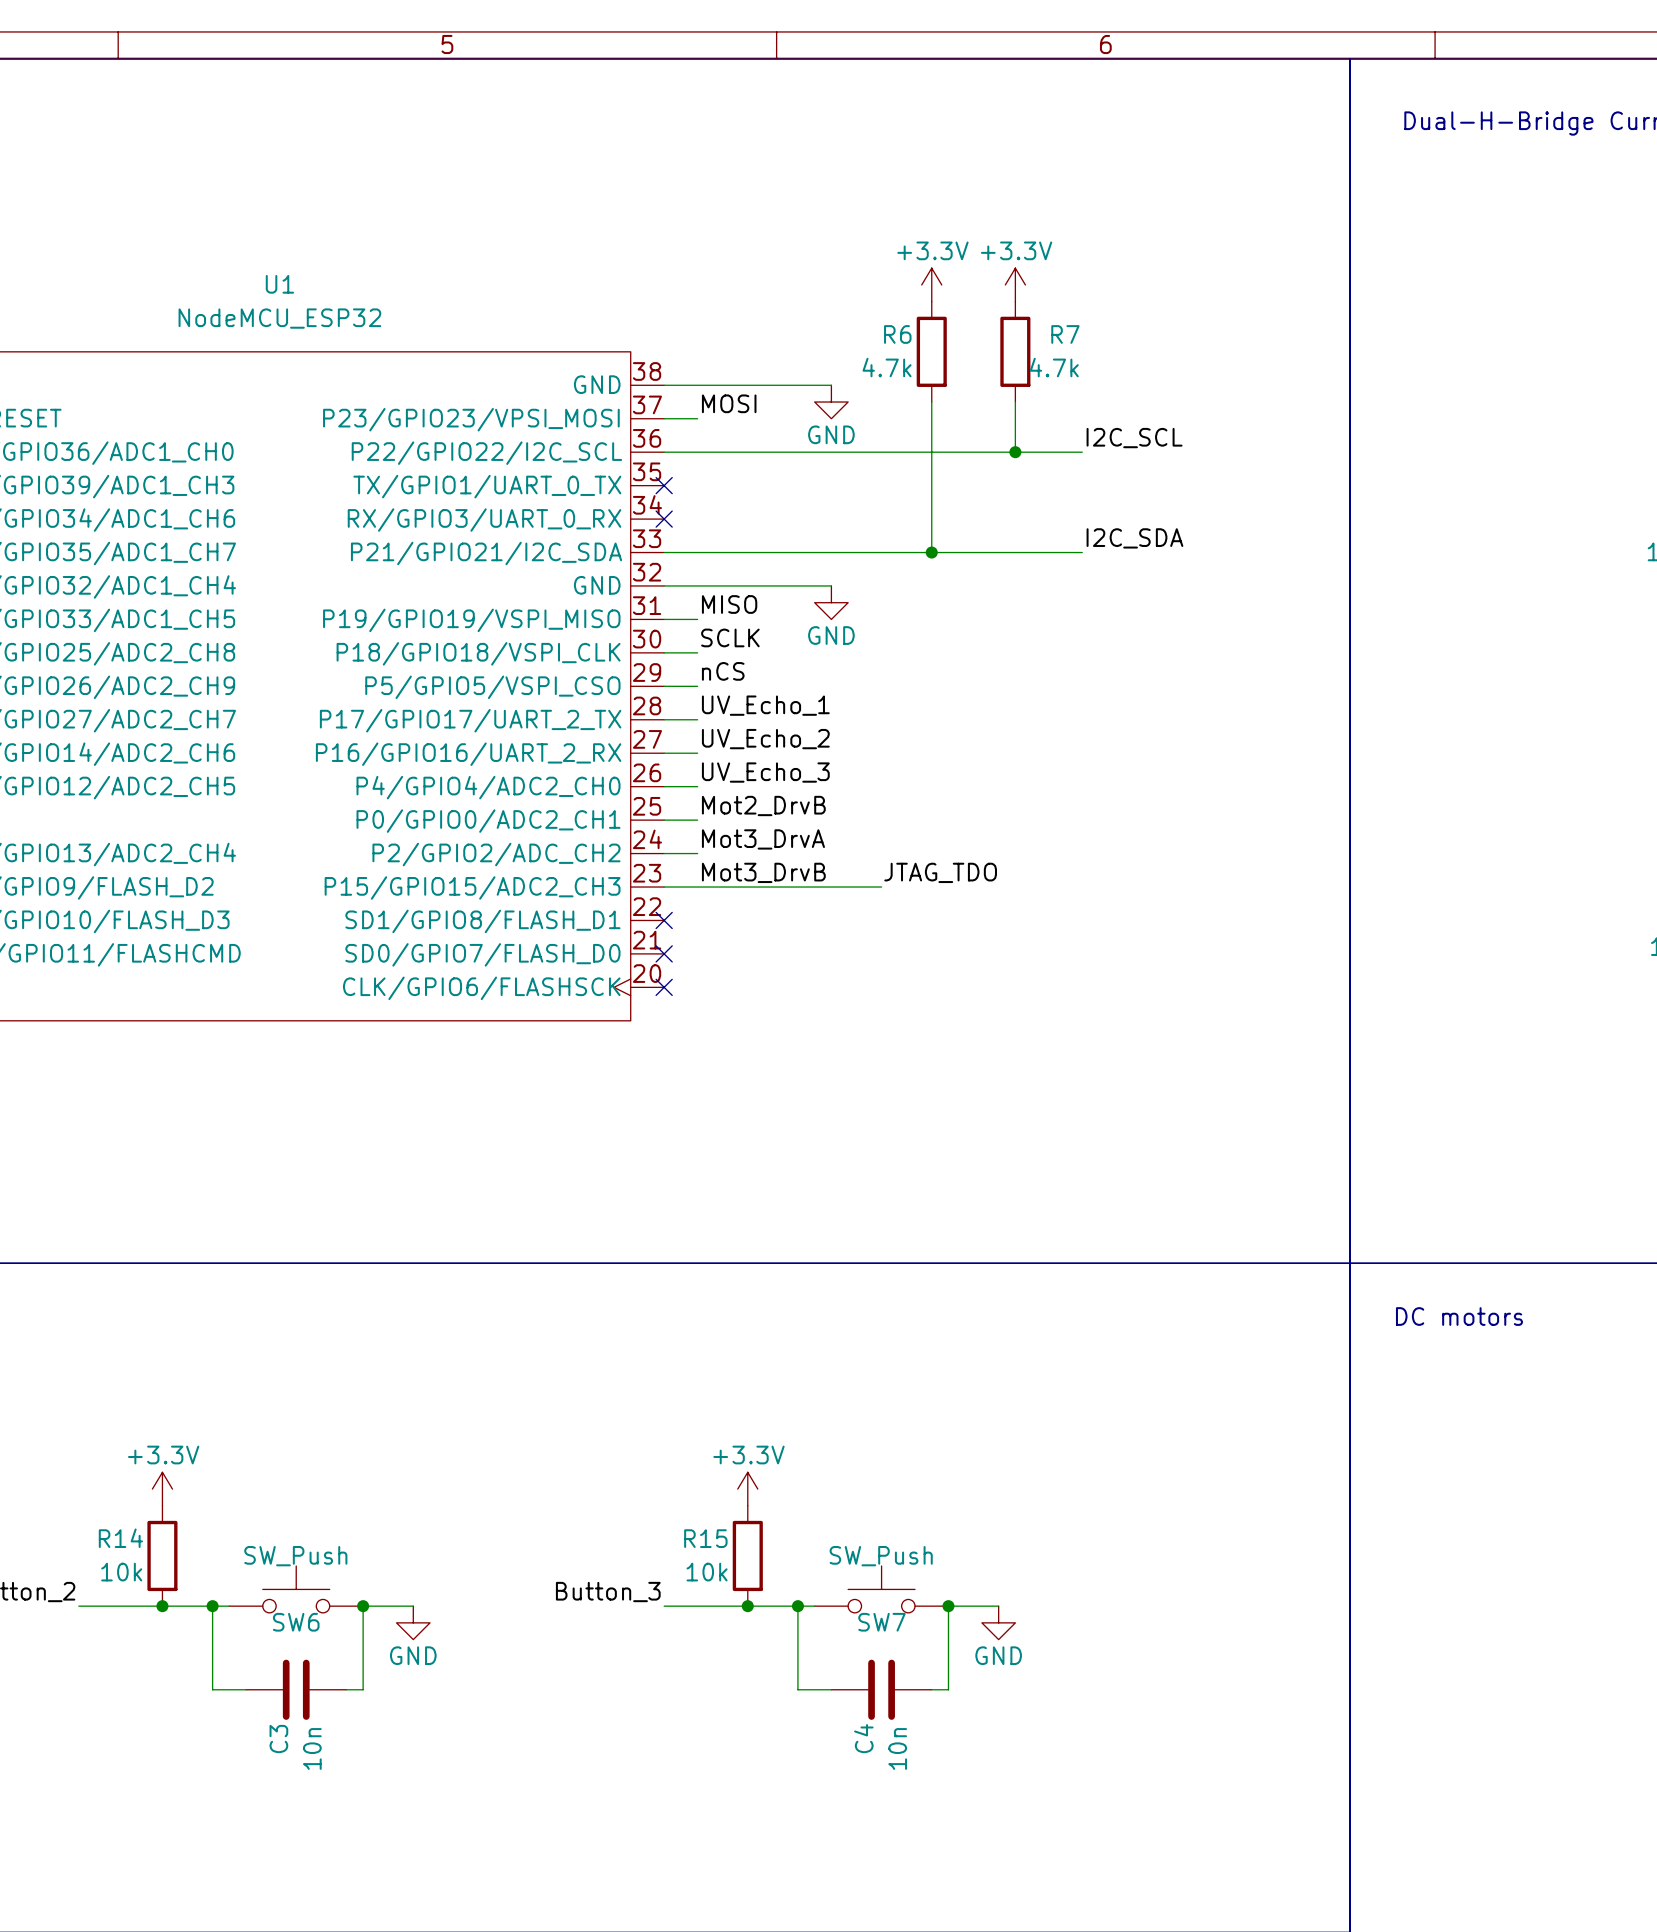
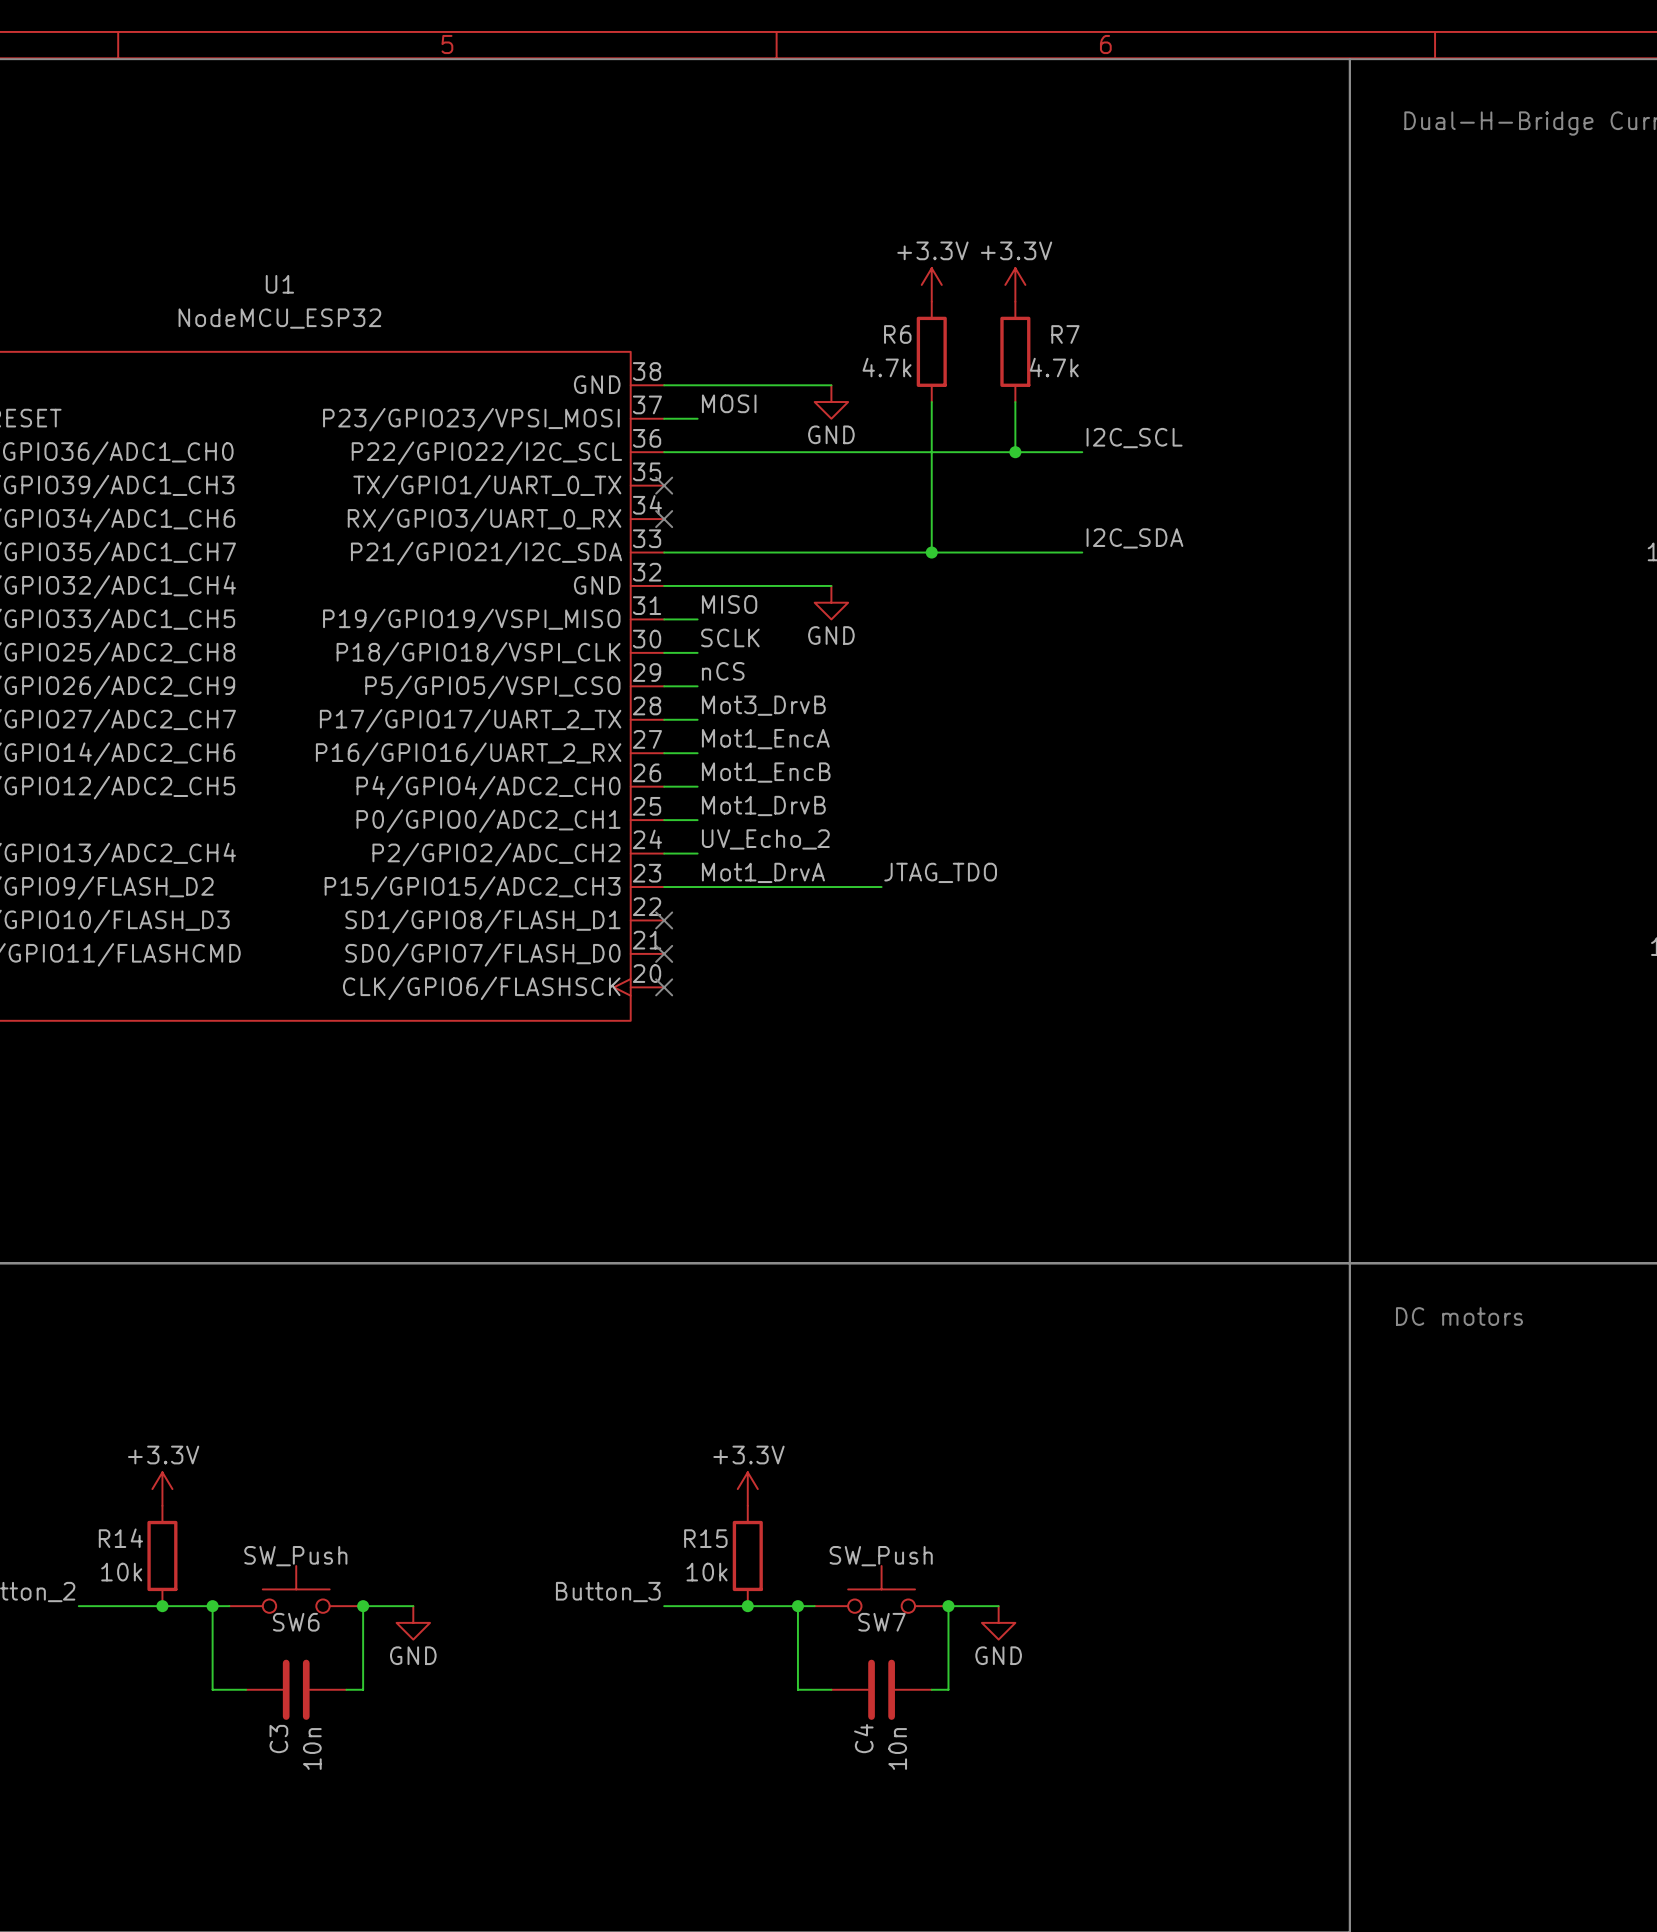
label: UV_Echo_1 (765, 705) -> Mot3_DrvB (763, 705)
label: UV_Echo_2 (765, 739) -> Mot1_EncA (765, 739)
label: UV_Echo_3 (765, 772) -> Mot1_EncB (766, 772)
label: Mot2_DrvB (763, 805) -> Mot1_DrvB (763, 805)
label: Mot3_DrvA (763, 839) -> UV_Echo_2 (765, 839)
label: Mot3_DrvB (763, 872) -> Mot1_DrvA (763, 872)

